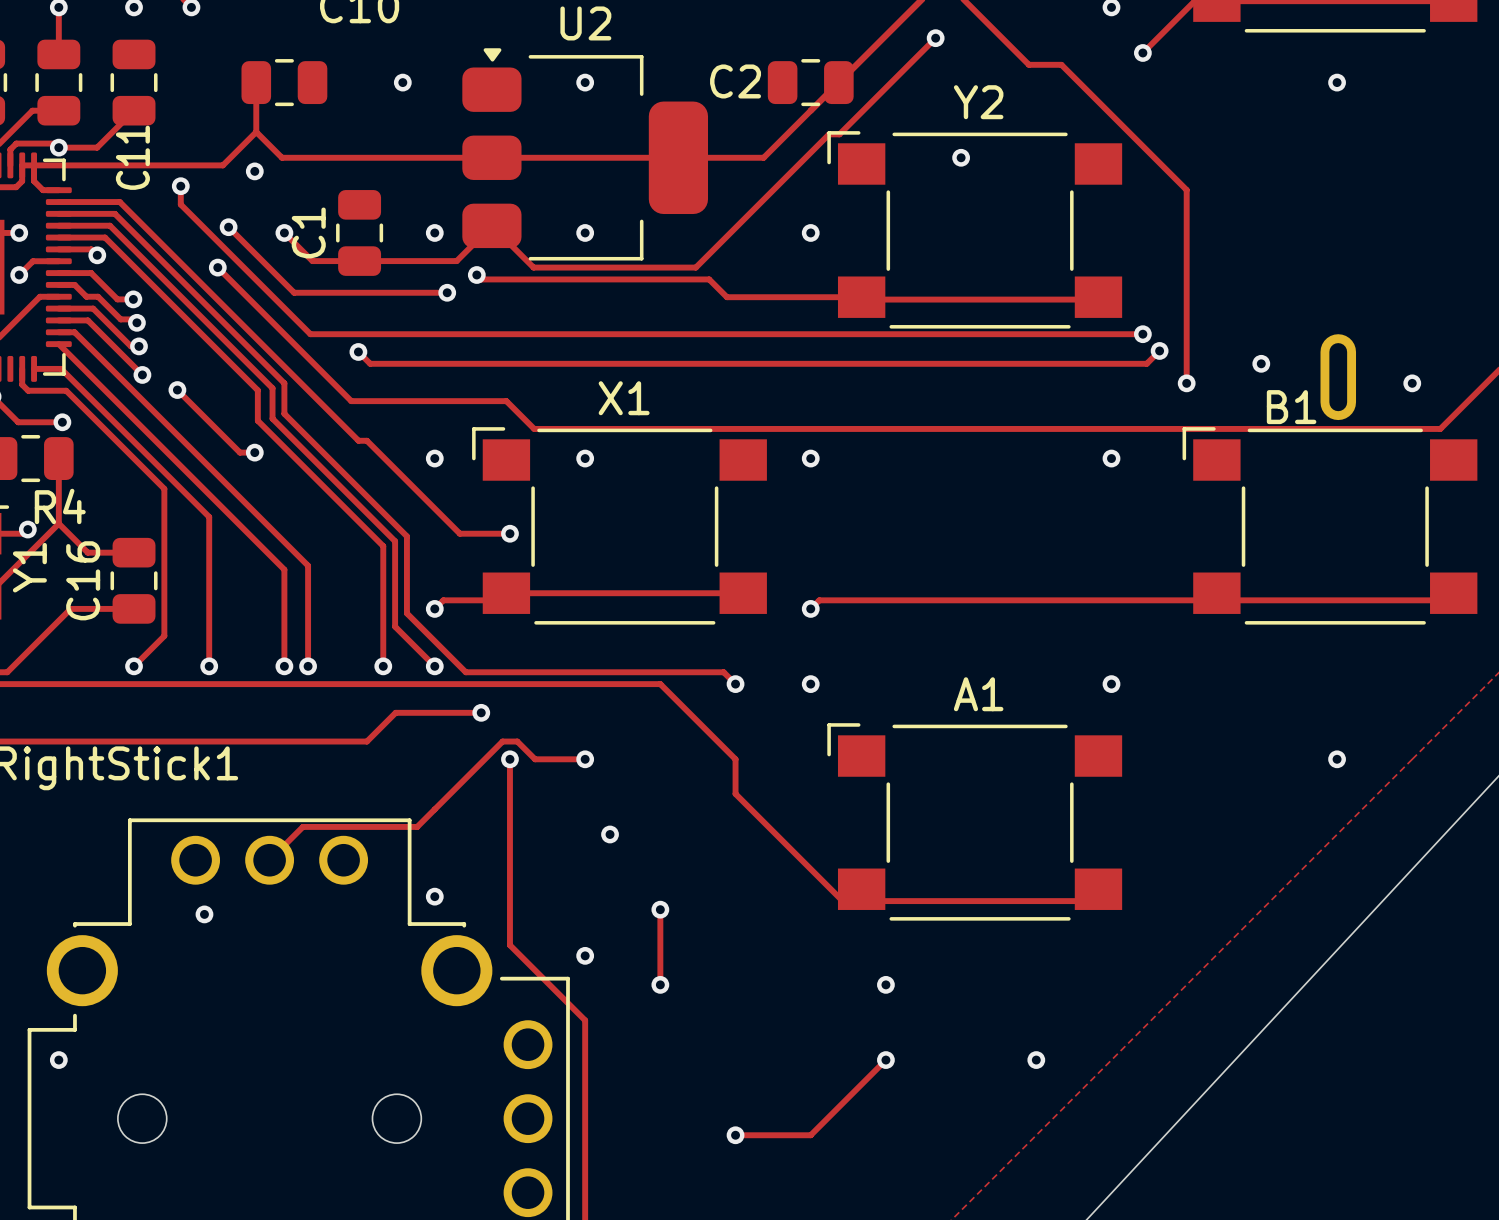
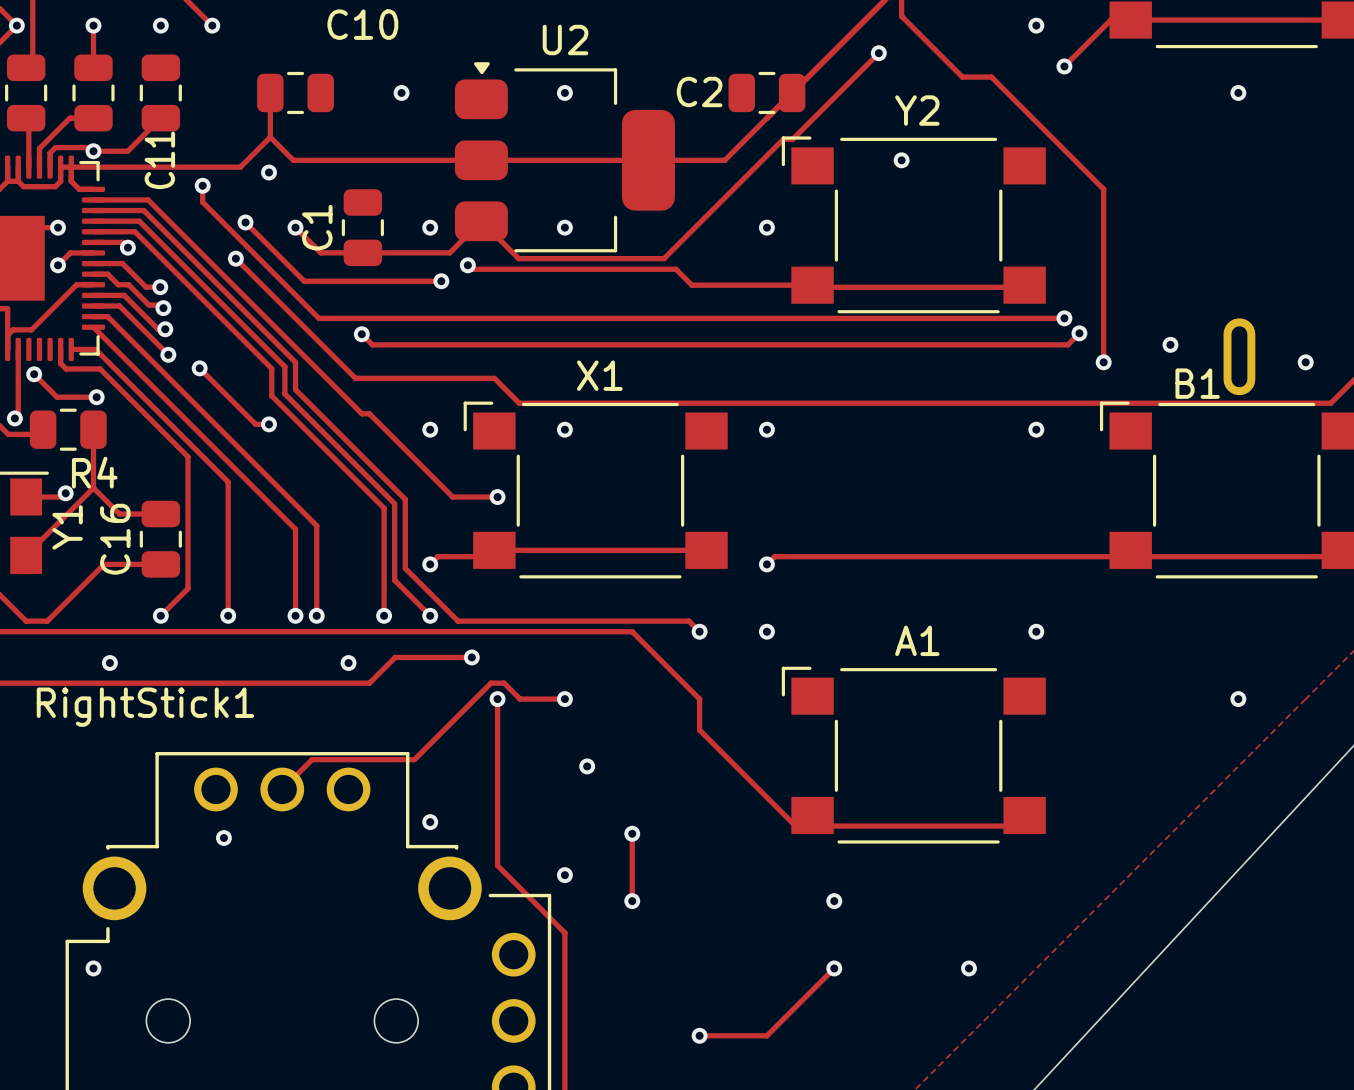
via: none -> (109, 663)
via: none -> (348, 663)

